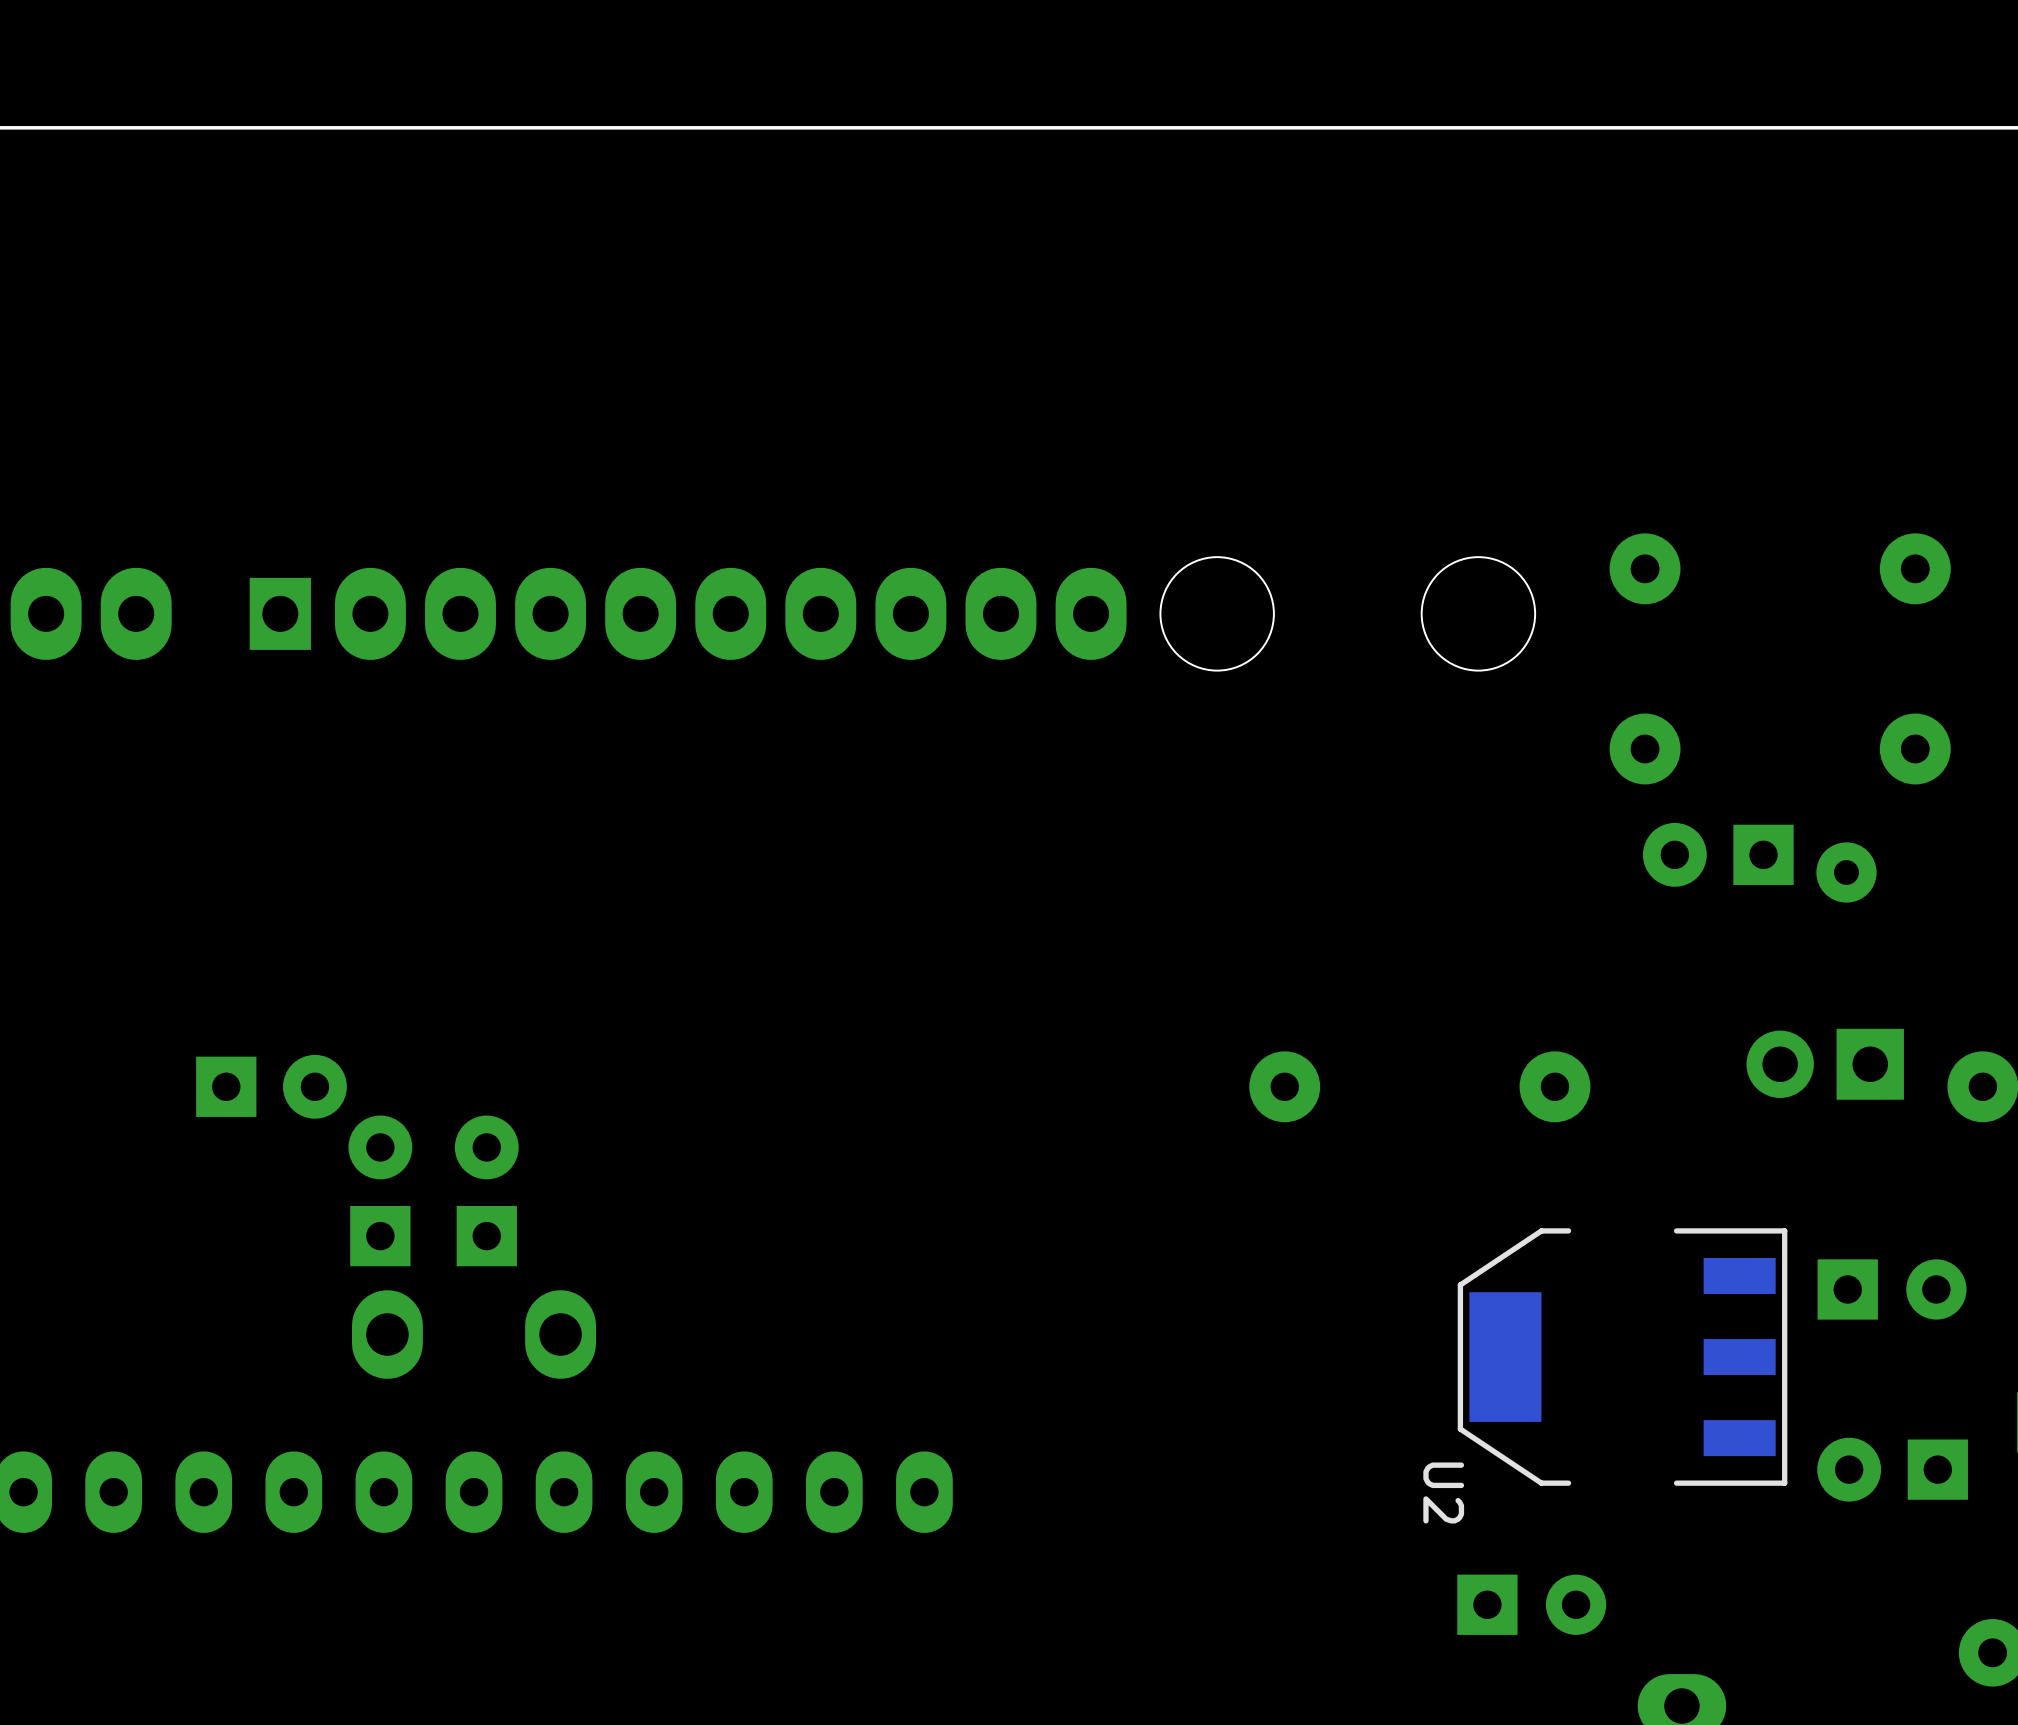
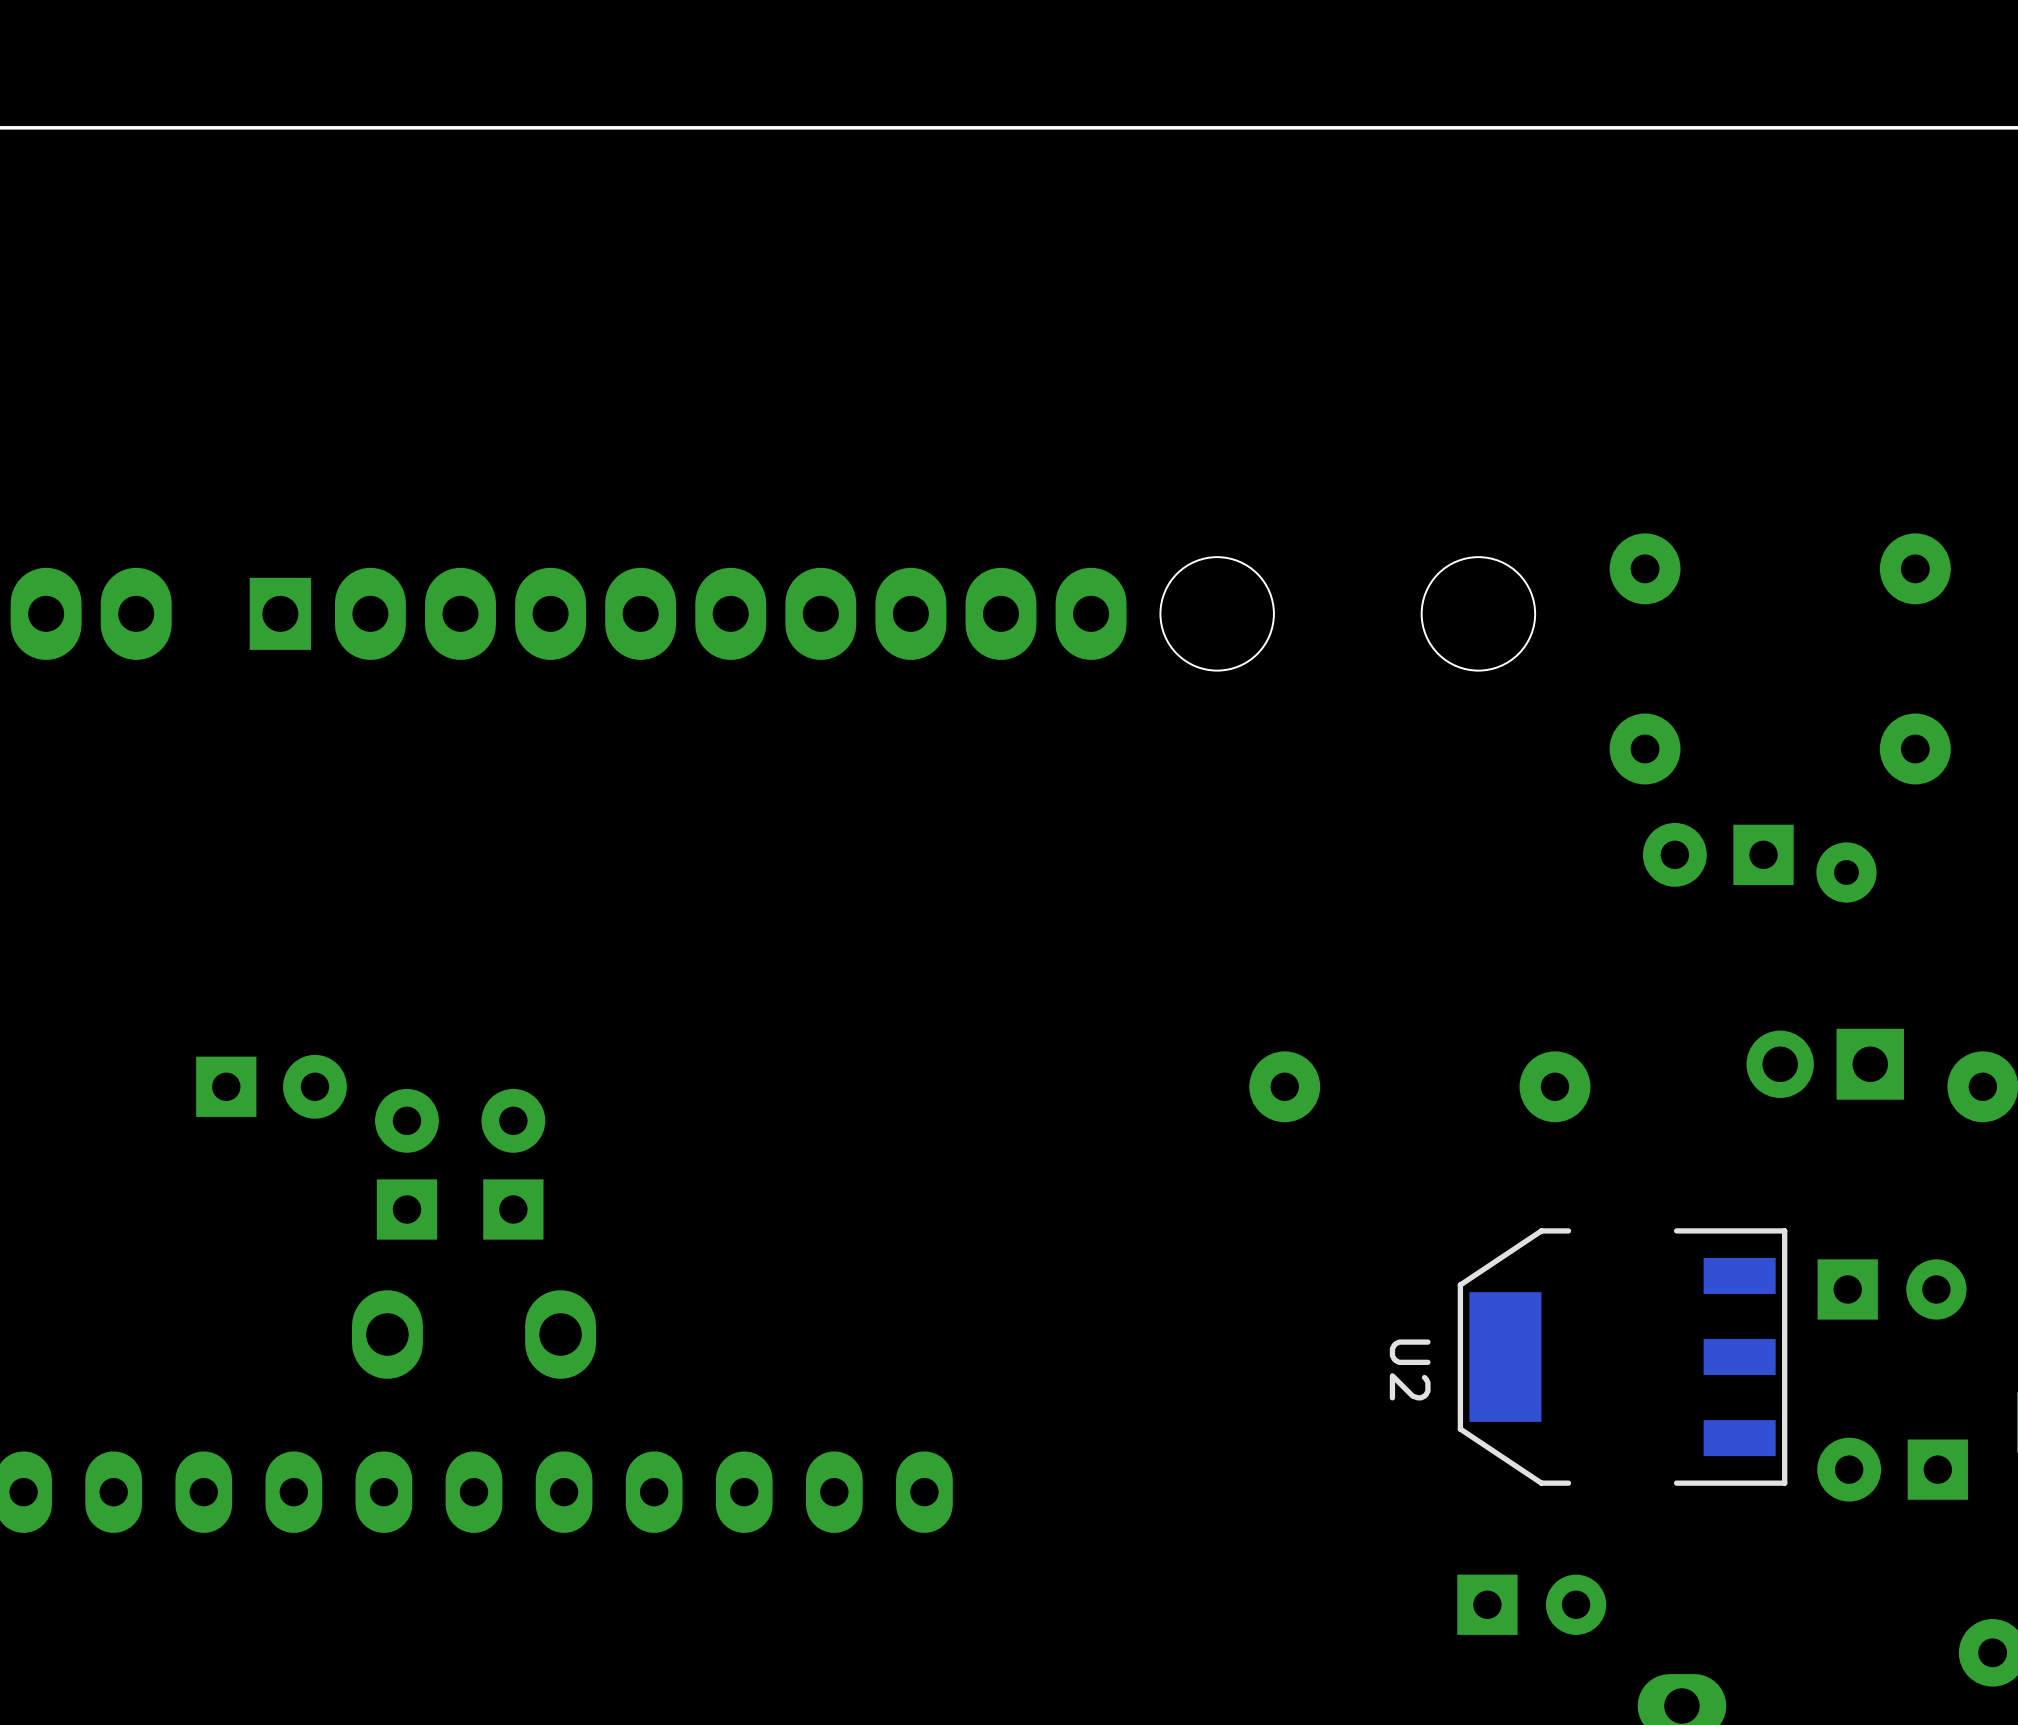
part position: (380, 1190) -> (406, 1164)
part position: (486, 1190) -> (513, 1164)
U2 name position: U2 (1443, 1493) -> U2 (1410, 1369)

